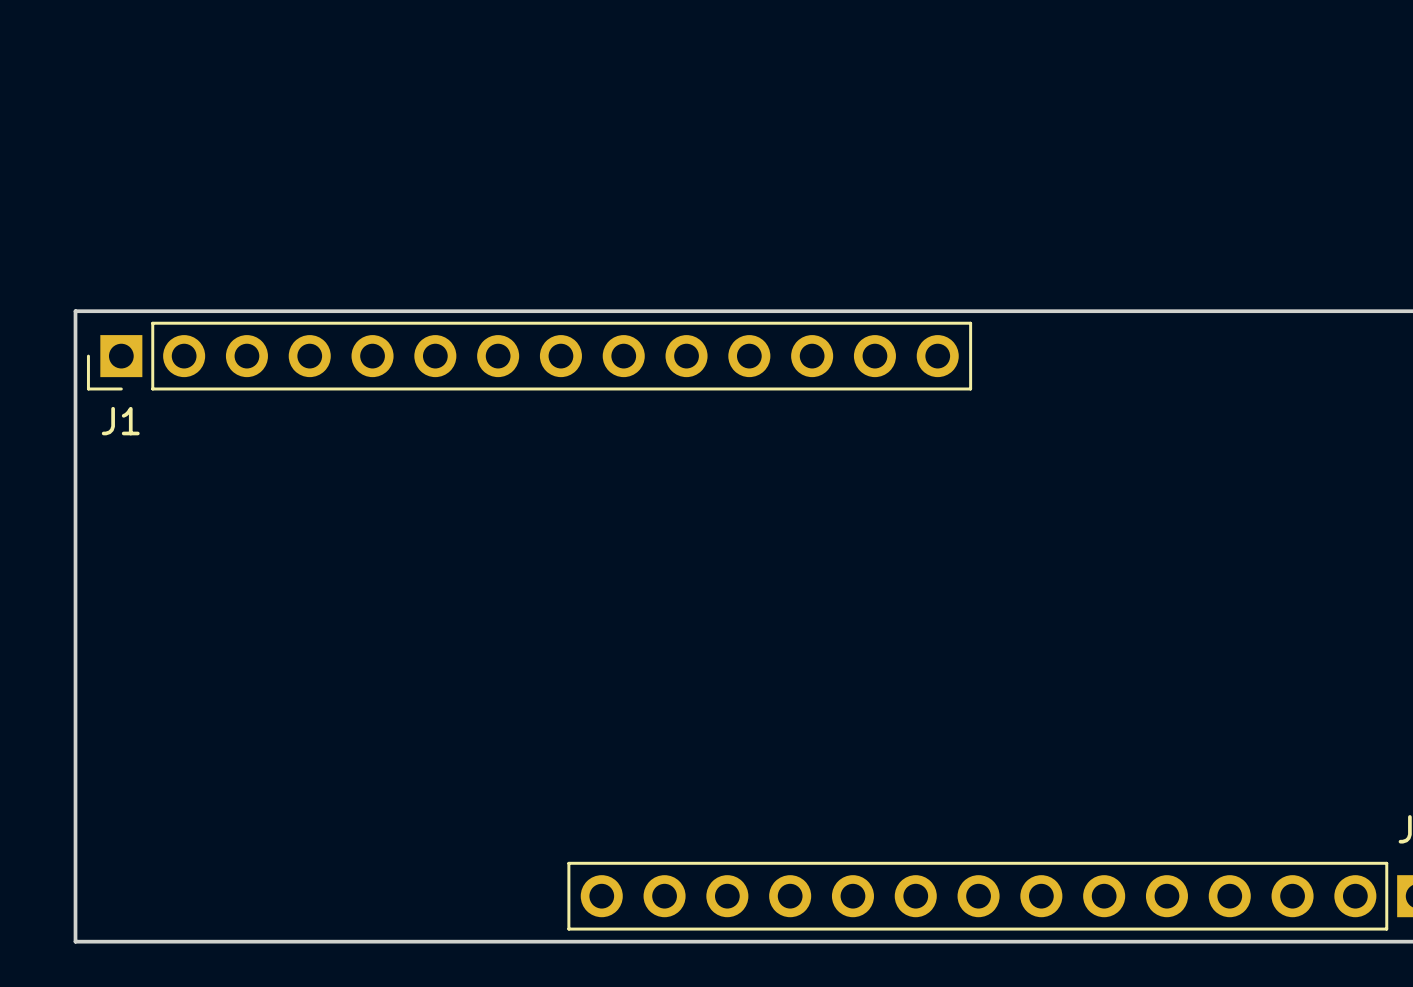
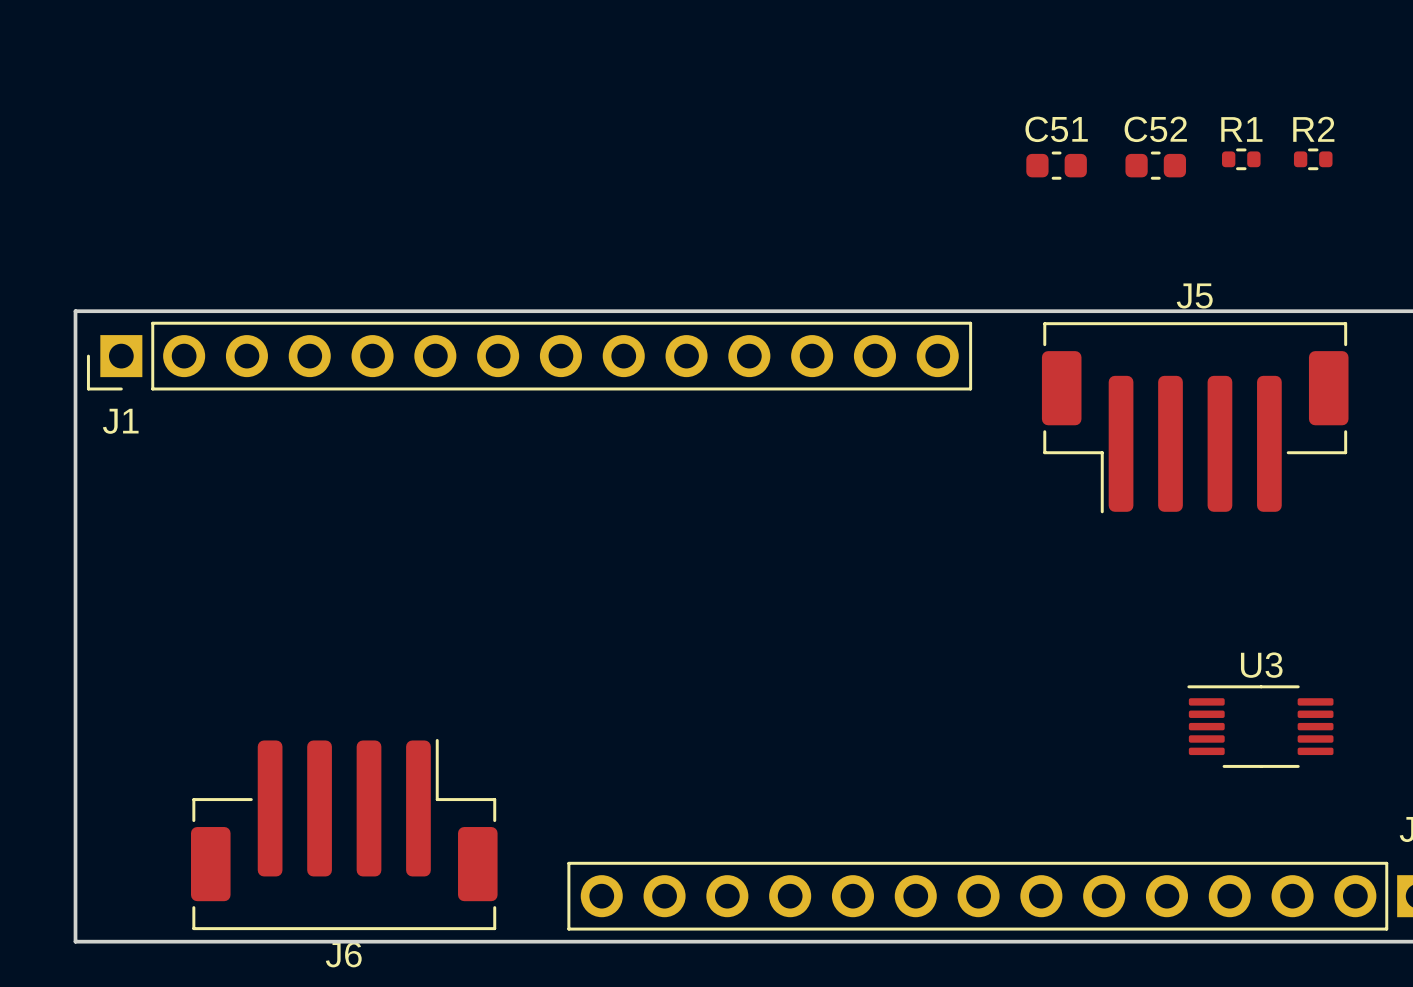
R1: none -> (1241, 159)
R2: none -> (1313, 159)
C51: none -> (1056, 165)
C52: none -> (1155, 165)
J5: none -> (1195, 417)
U3: none -> (1260, 726)
J6: none -> (344, 834)

